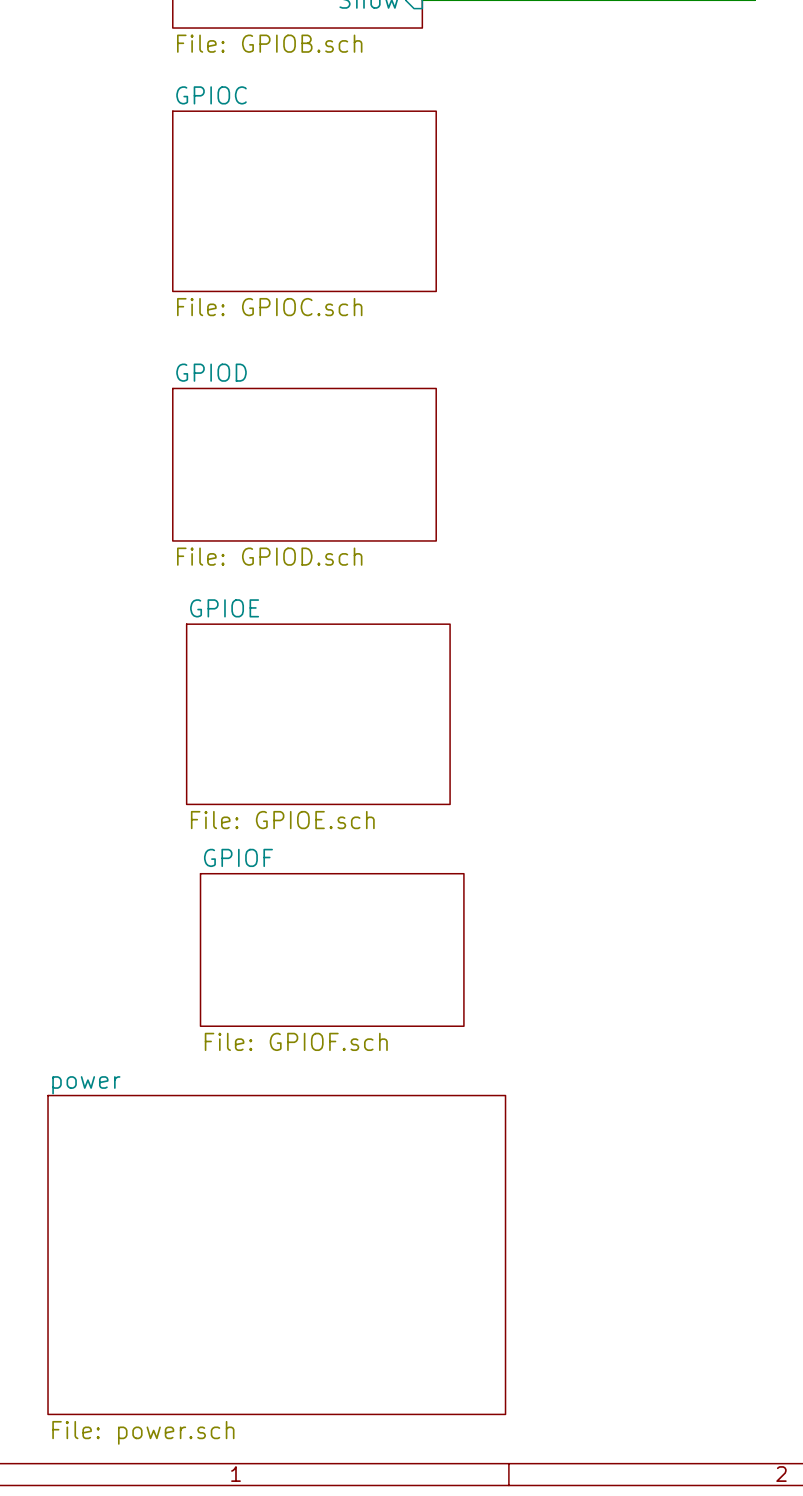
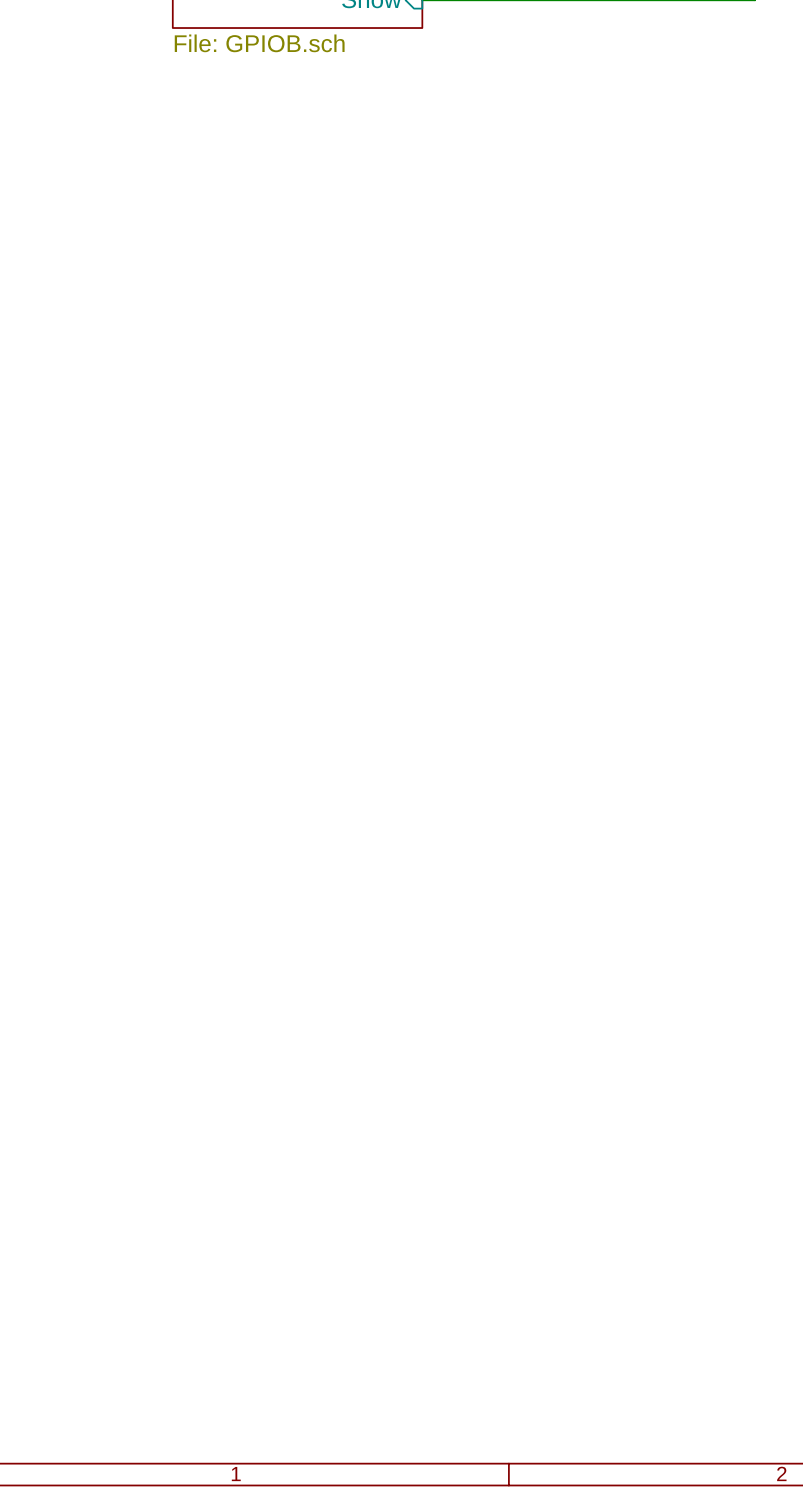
sheet GPIOC: File: GPIOC.sch (304, 201) -> none
sheet GPIOD: File: GPIOD.sch (304, 464) -> none
sheet GPIOE: File: GPIOE.sch (318, 714) -> none
sheet GPIOF: File: GPIOF.sch (332, 949) -> none
sheet power: File: power.sch (276, 1254) -> none

